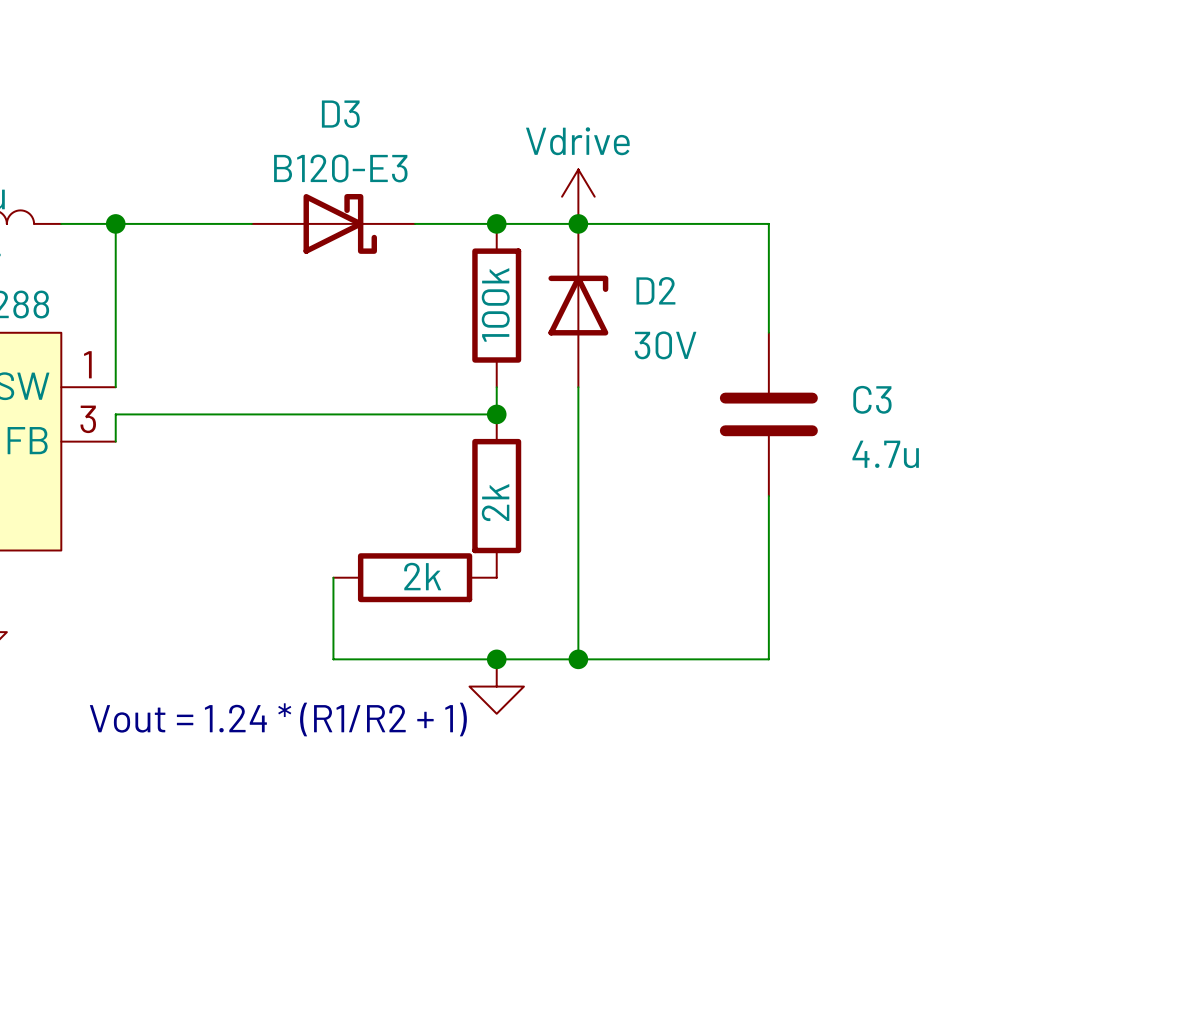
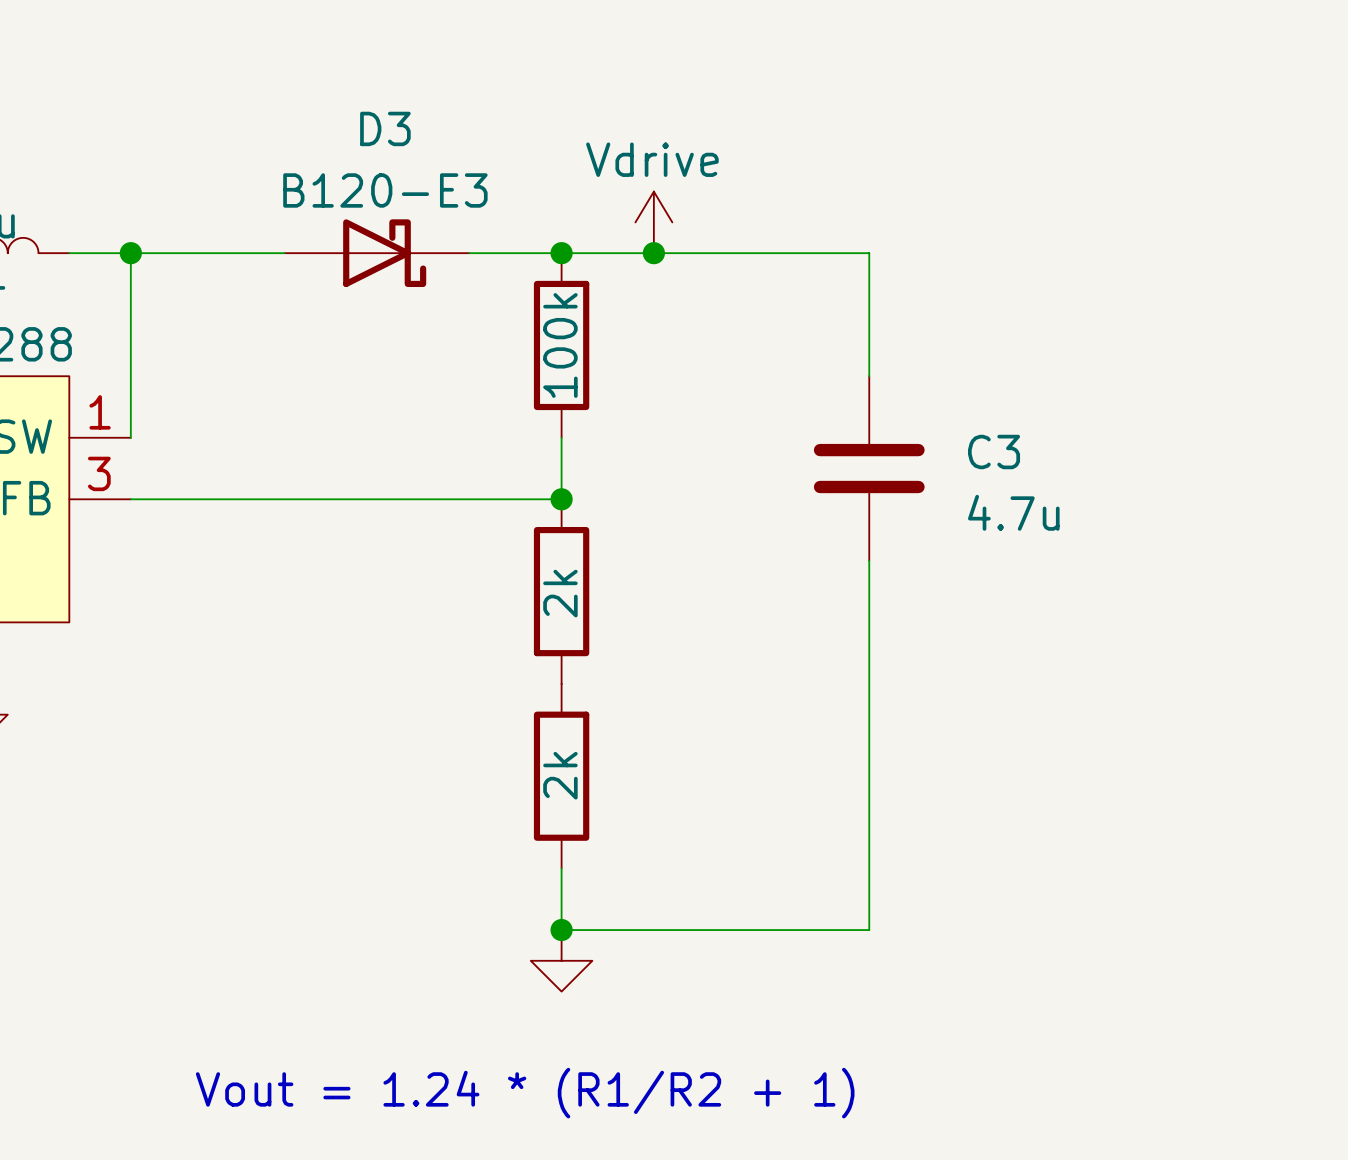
D2: 30V (578, 305) -> none
wire: (578, 387) (578, 659) -> none
wire: (496, 414) (115, 414) (115, 441) -> (561, 468) (561, 499) (130, 499)
junction position: (496, 414) -> (561, 499)
part position: (496, 496) -> (561, 591)
wire: (333, 577) (333, 659) (768, 659) -> (561, 868) (561, 930) (869, 930) (869, 745)
part: 2k (415, 577) -> none
junction: (496, 659) -> none
junction: (578, 659) -> none
part: none -> 2k (561, 776)
power symbol position: (496, 686) -> (561, 960)
text position: Vout = 1.24 * (R1/R2 + 1) (278, 719) -> Vout = 1.24 * (R1/R2 + 1) (525, 1093)
junction: none -> (561, 930)

